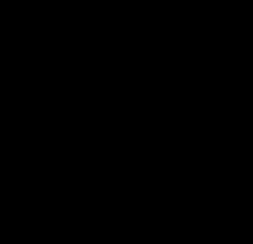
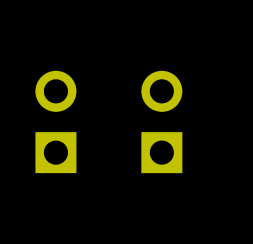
part: none -> (55, 121)
part: none -> (161, 121)

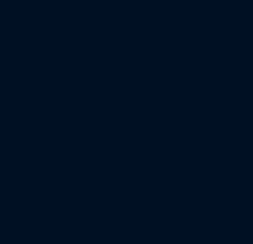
part: (55, 121) -> none
part: (161, 121) -> none

